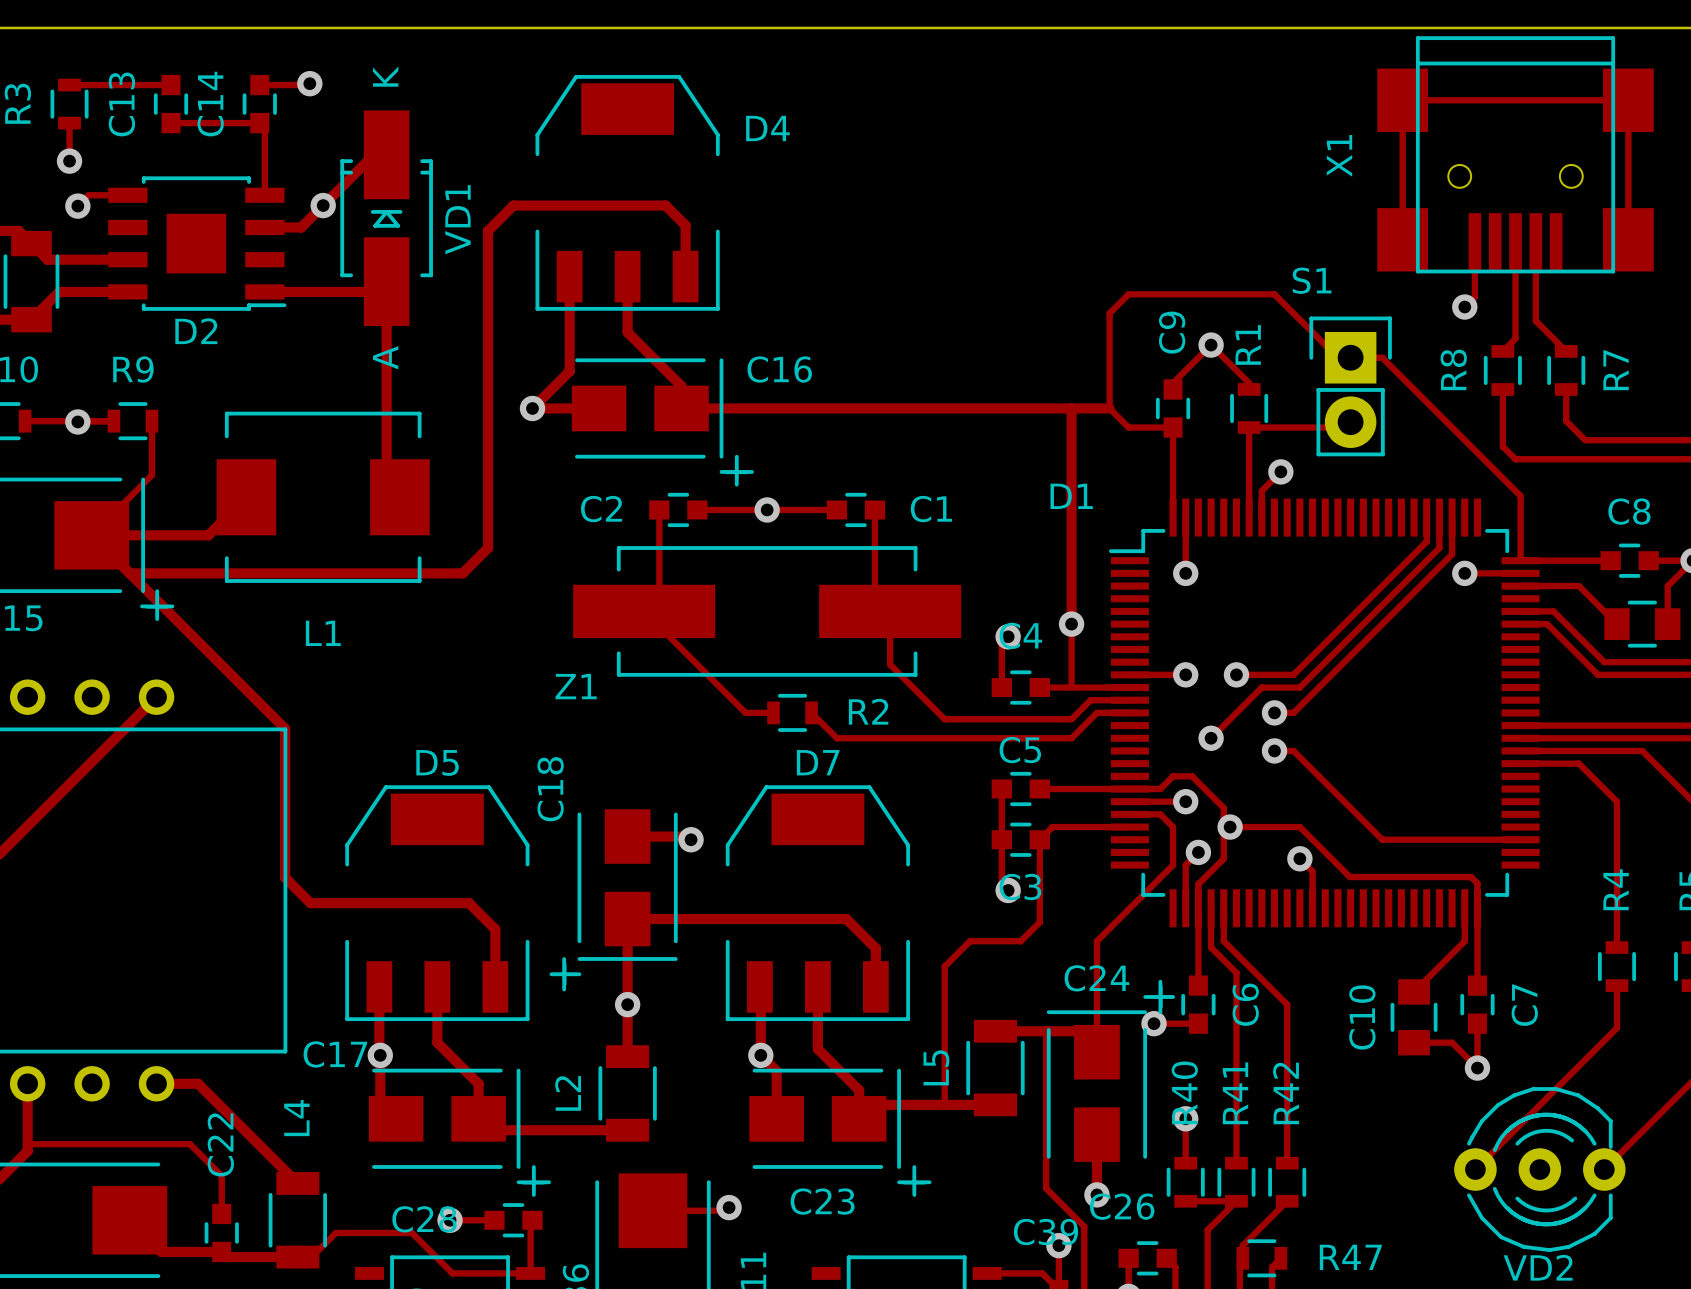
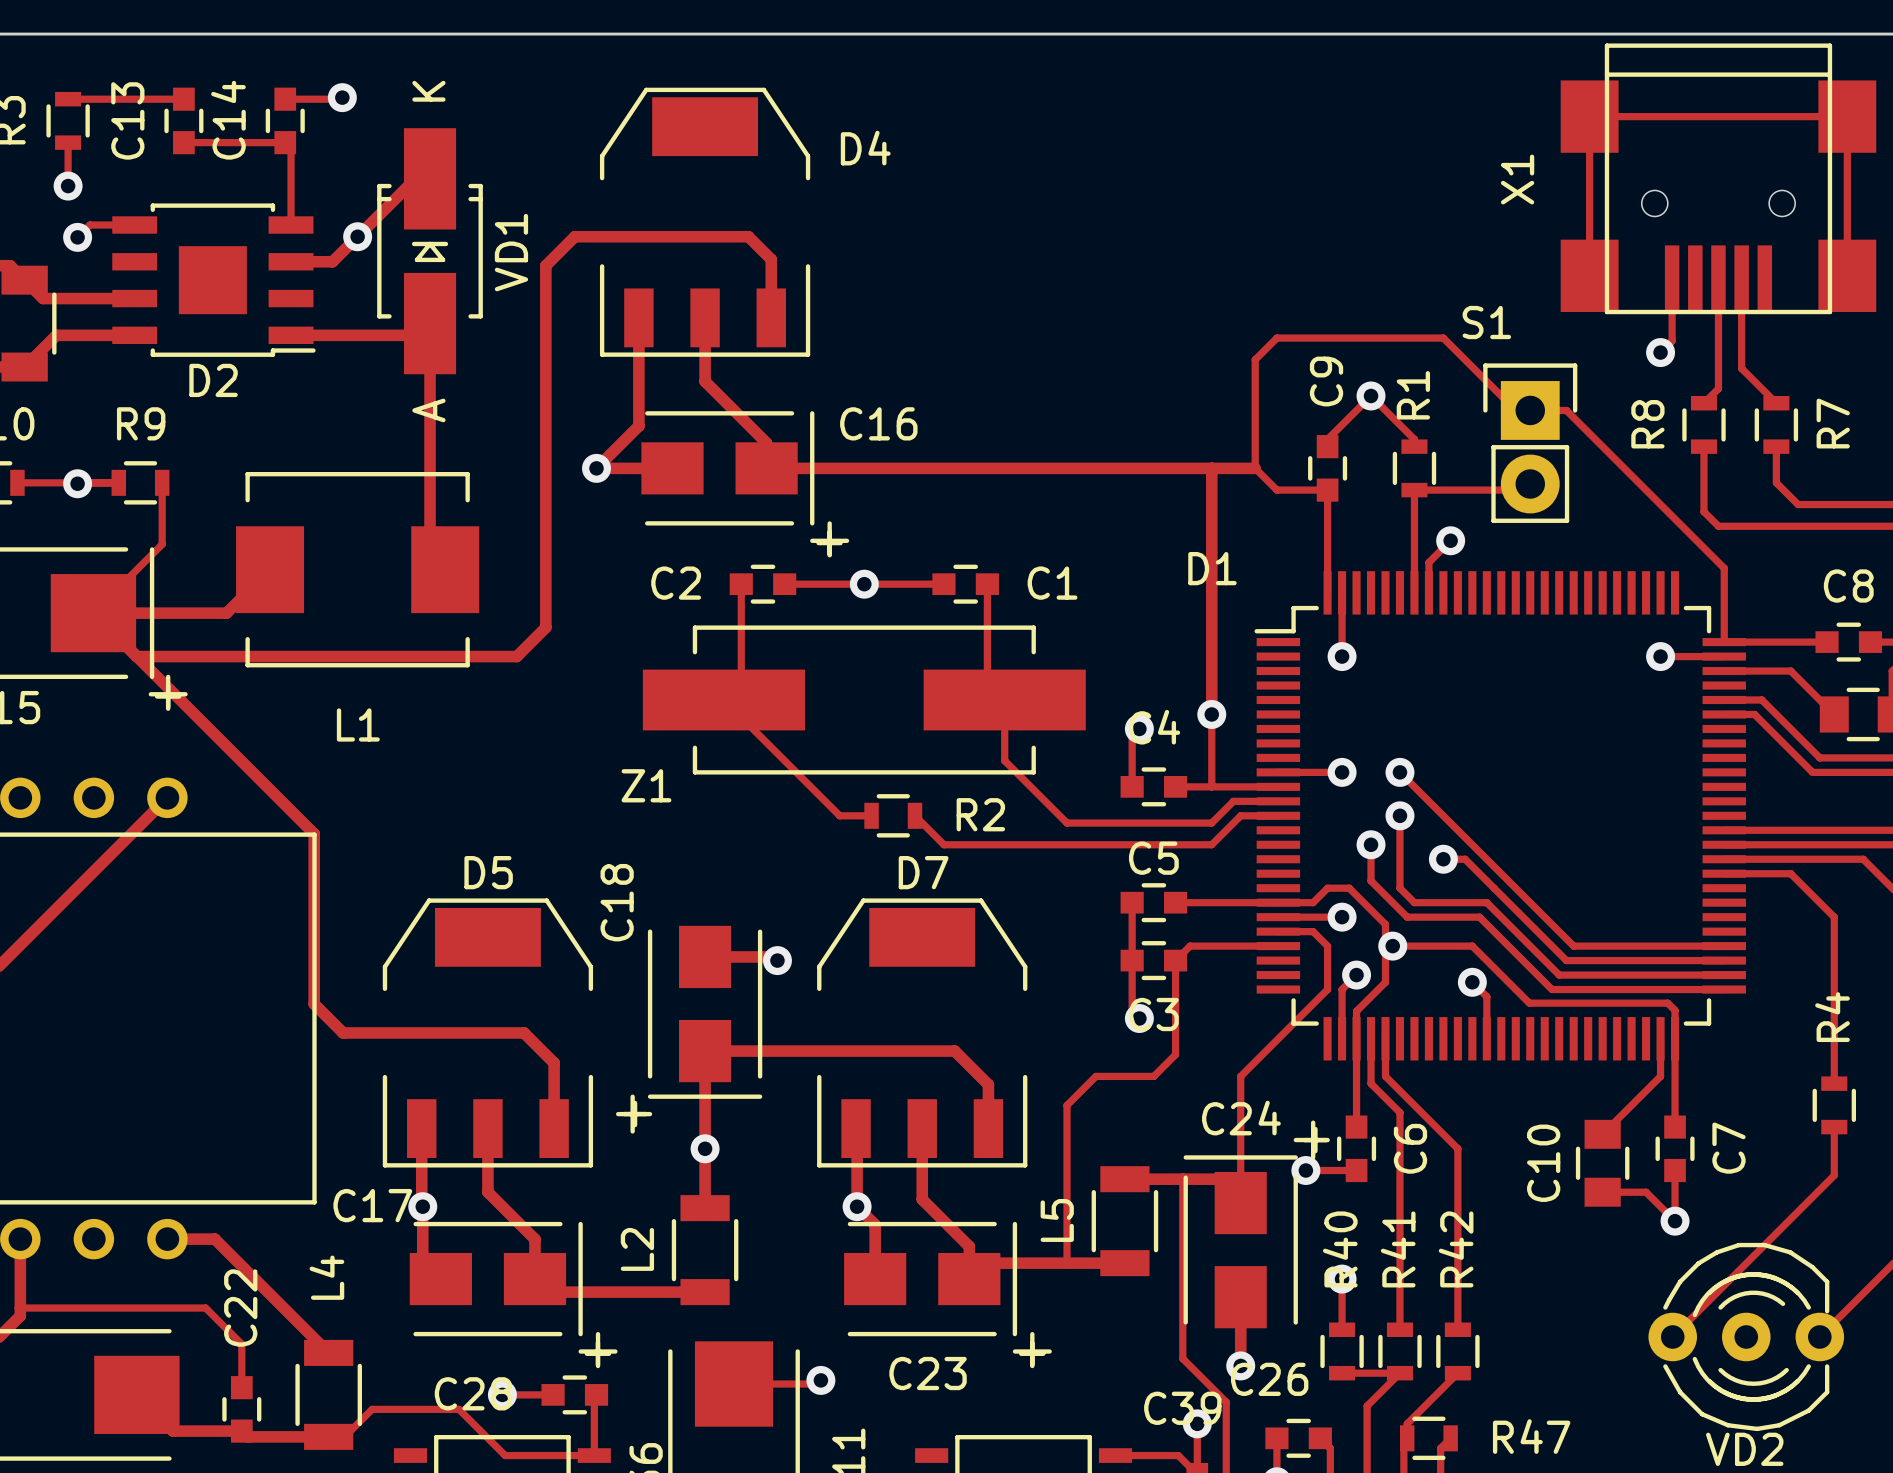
track: (1426, 517) (1426, 541) (1293, 674) (1236, 674) -> (1724, 946) (1573, 946) (1399, 772)
track: (1439, 517) (1439, 548) (1299, 687) (1261, 687) (1211, 738) -> (1724, 989) (1551, 989) (1479, 917) (1407, 917) (1371, 880) (1371, 844)
track: (1452, 517) (1452, 554) (1293, 712) (1274, 712) -> none
track: none -> (1399, 815) (1399, 888) (1414, 902) (1486, 902) (1559, 975) (1724, 975)
via position: (1274, 712) -> (1399, 815)

